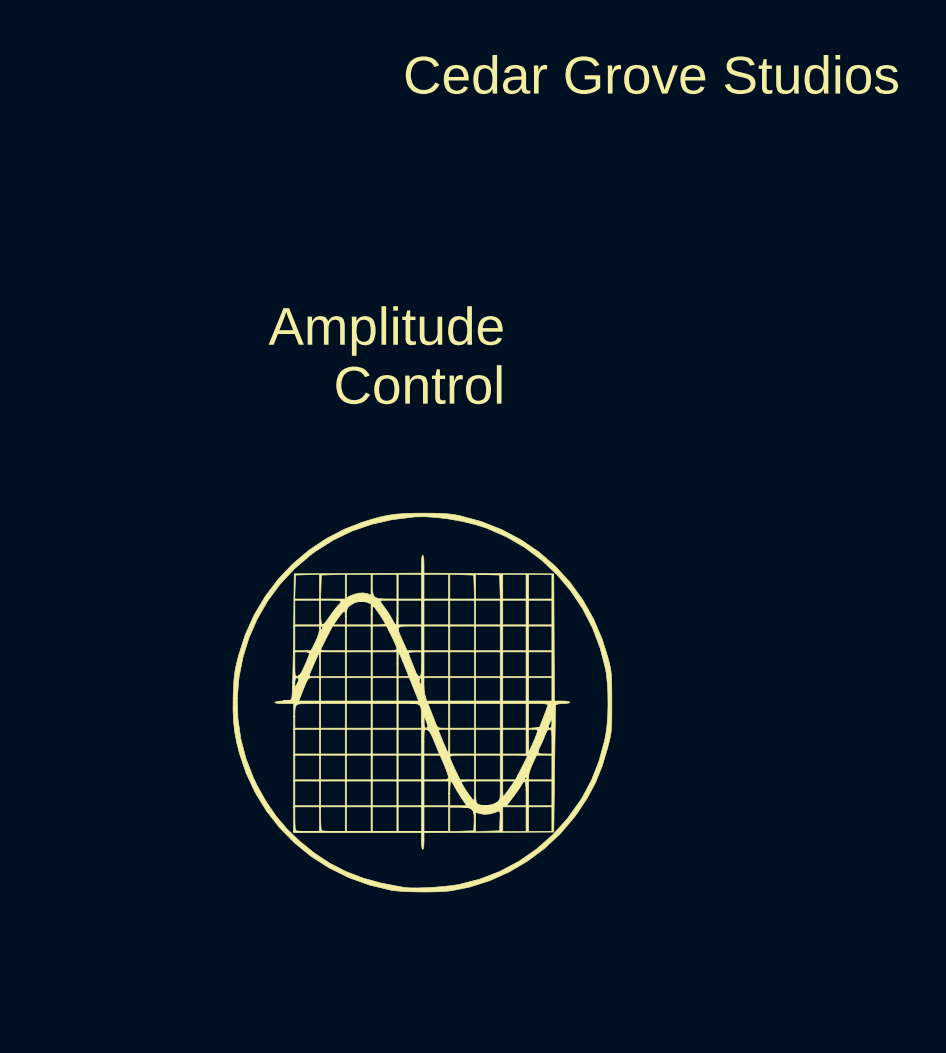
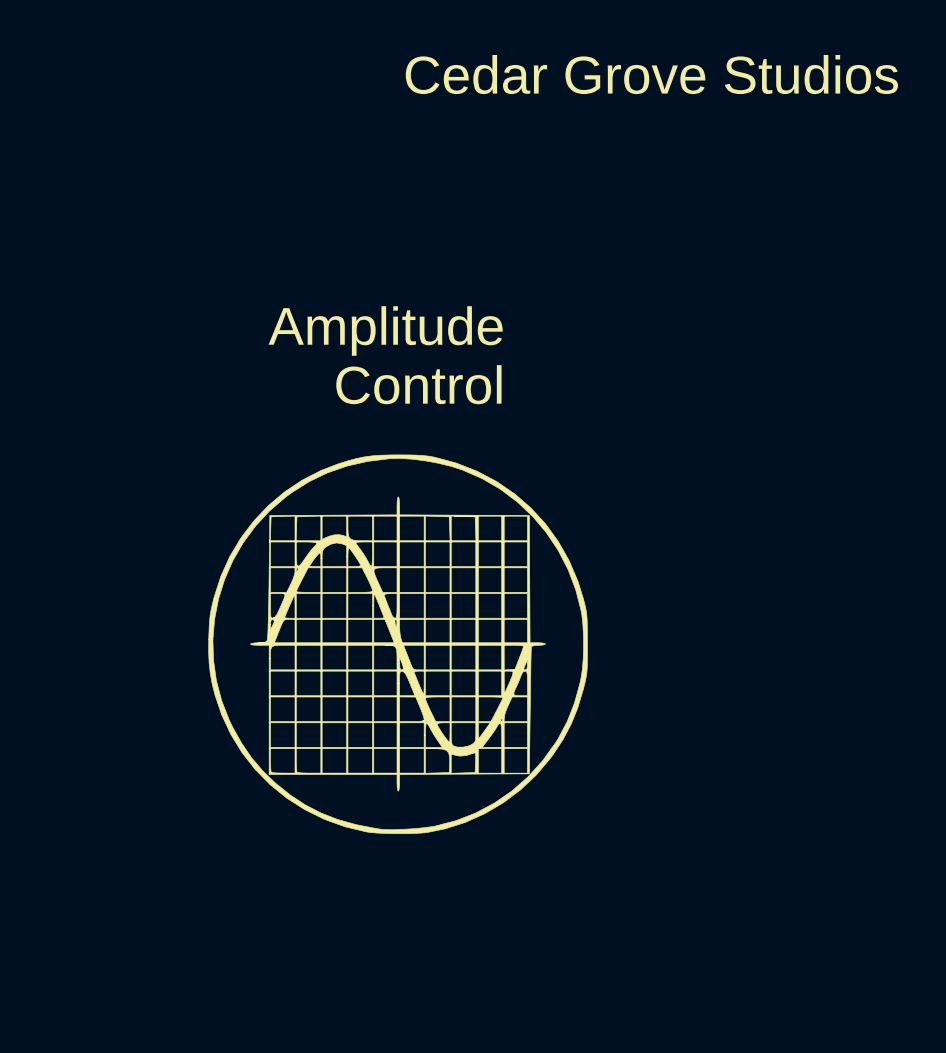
drawing position: (422, 702) -> (398, 644)

